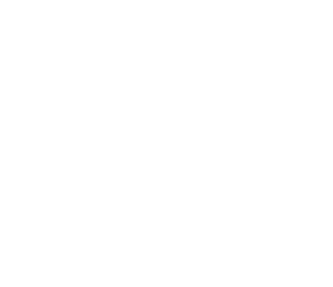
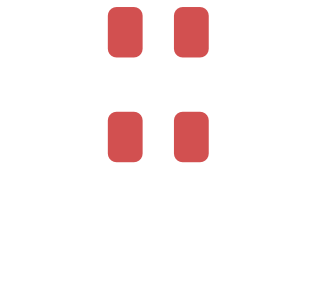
part: none -> (158, 32)
part: none -> (158, 136)

